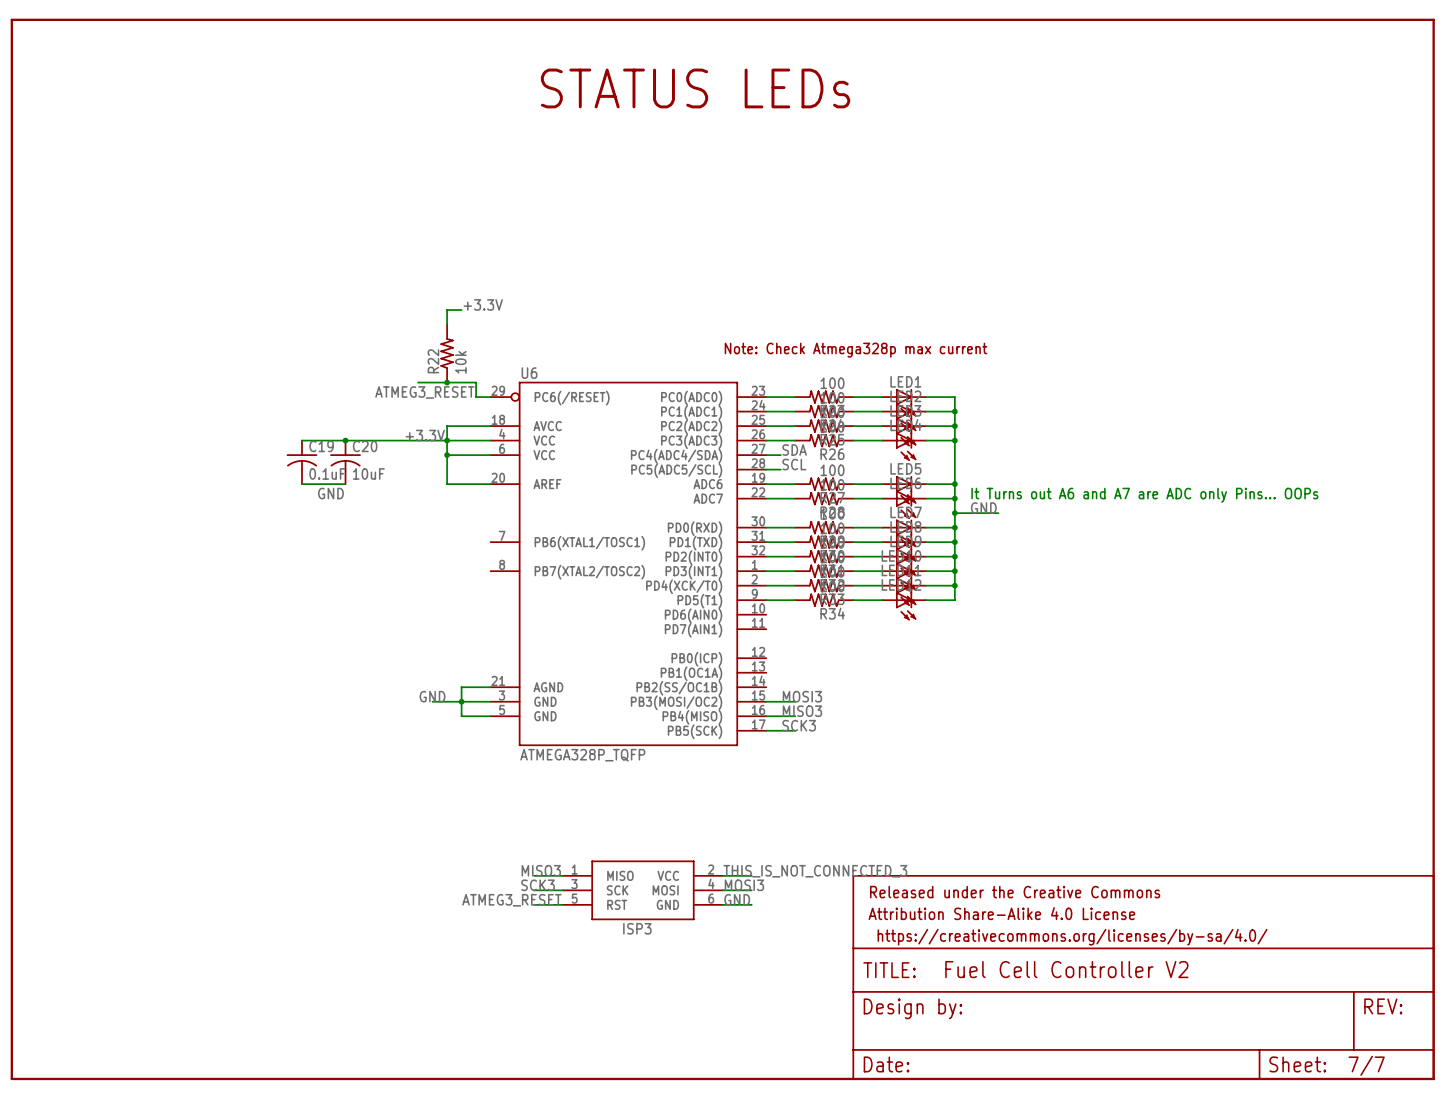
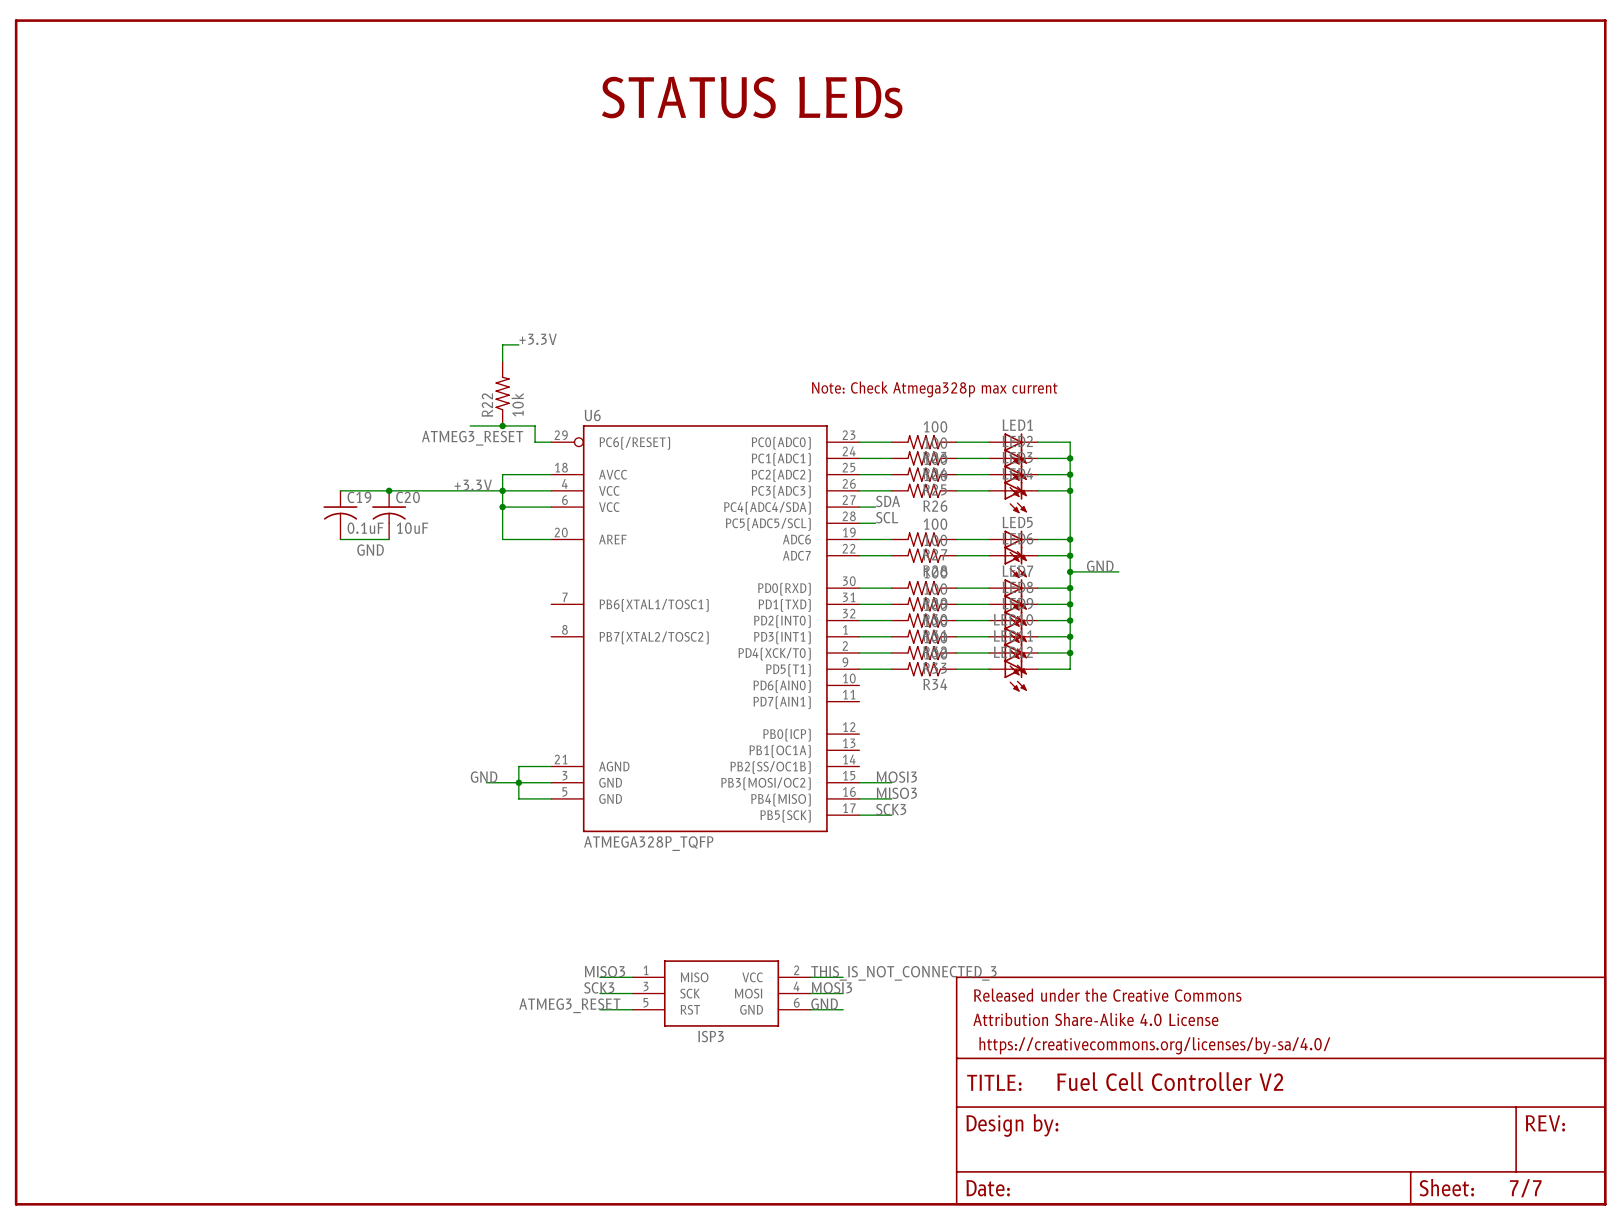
text: It Turns out A6 and A7 are ADC only Pins... OOPs (1144, 495) -> none

